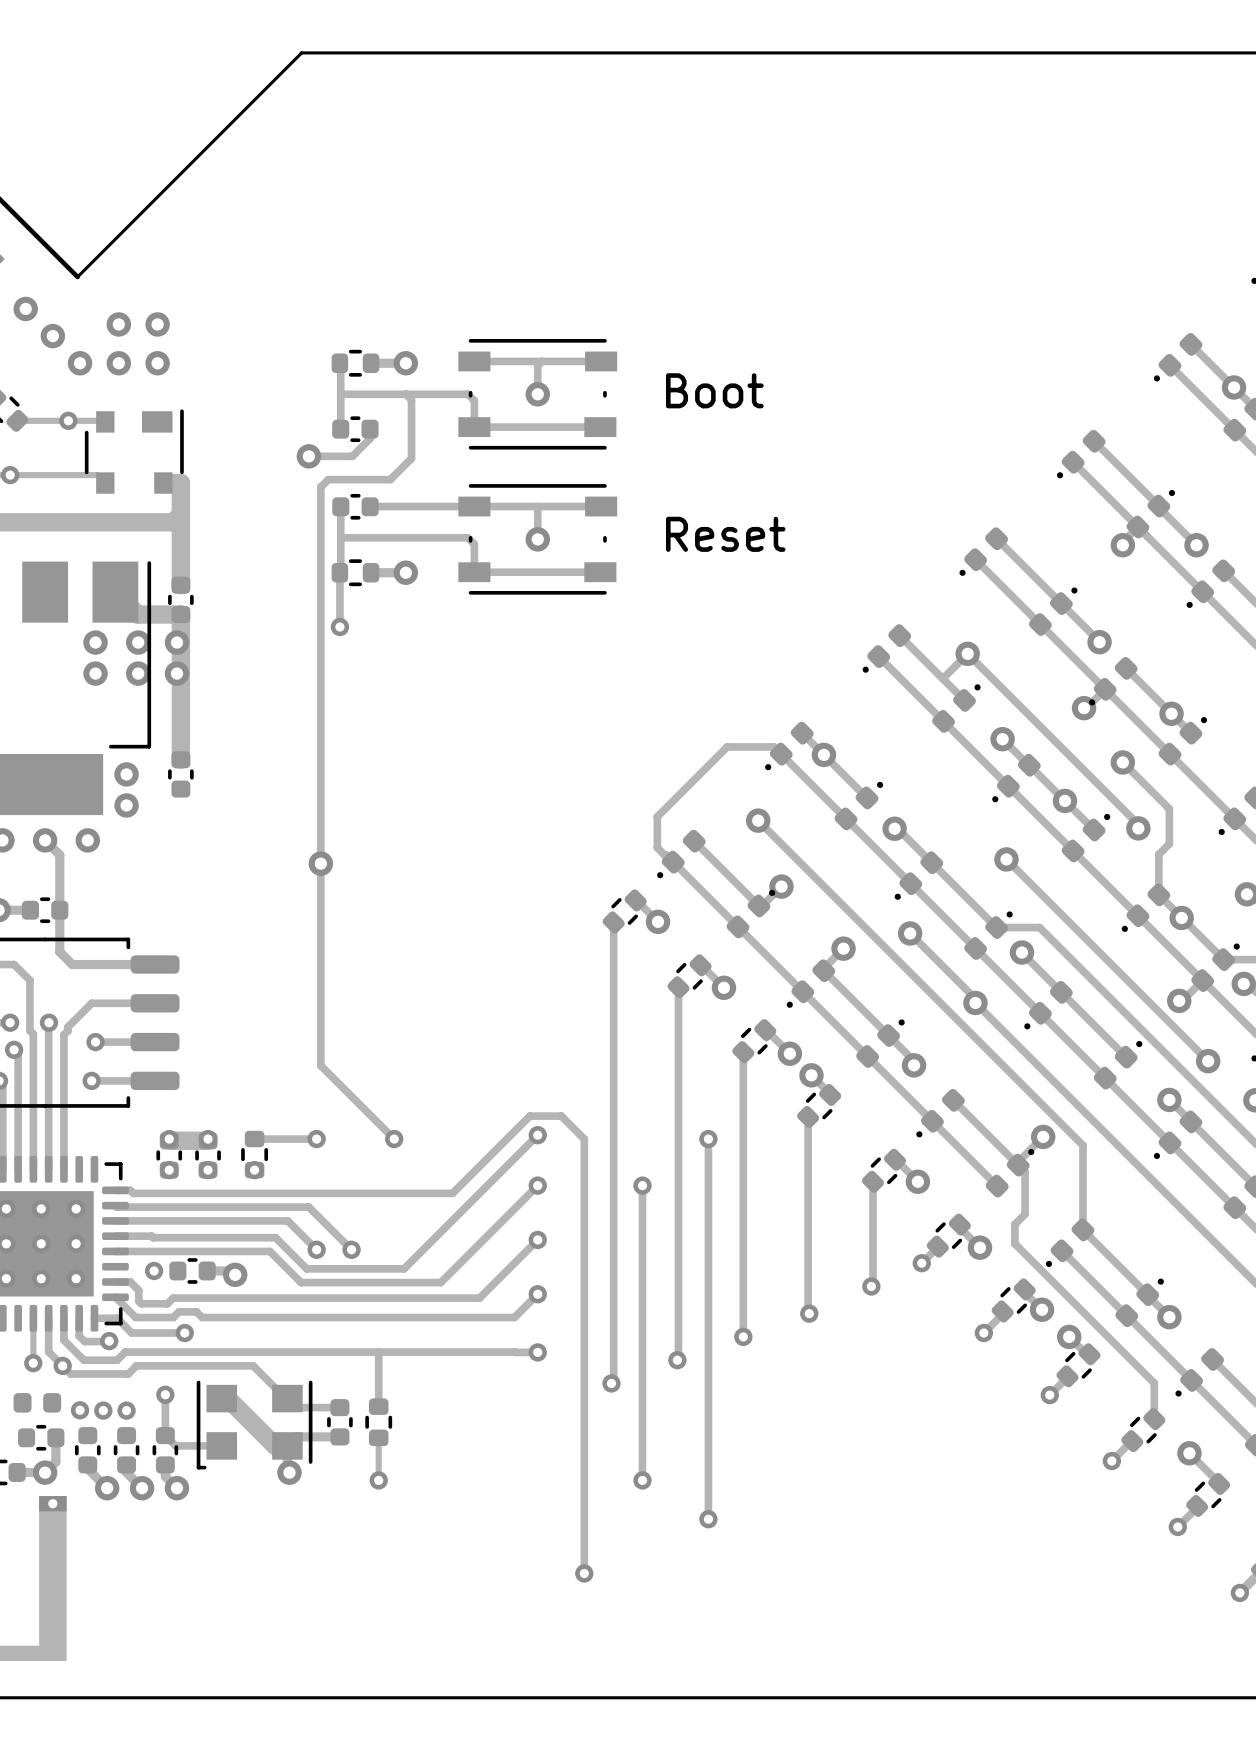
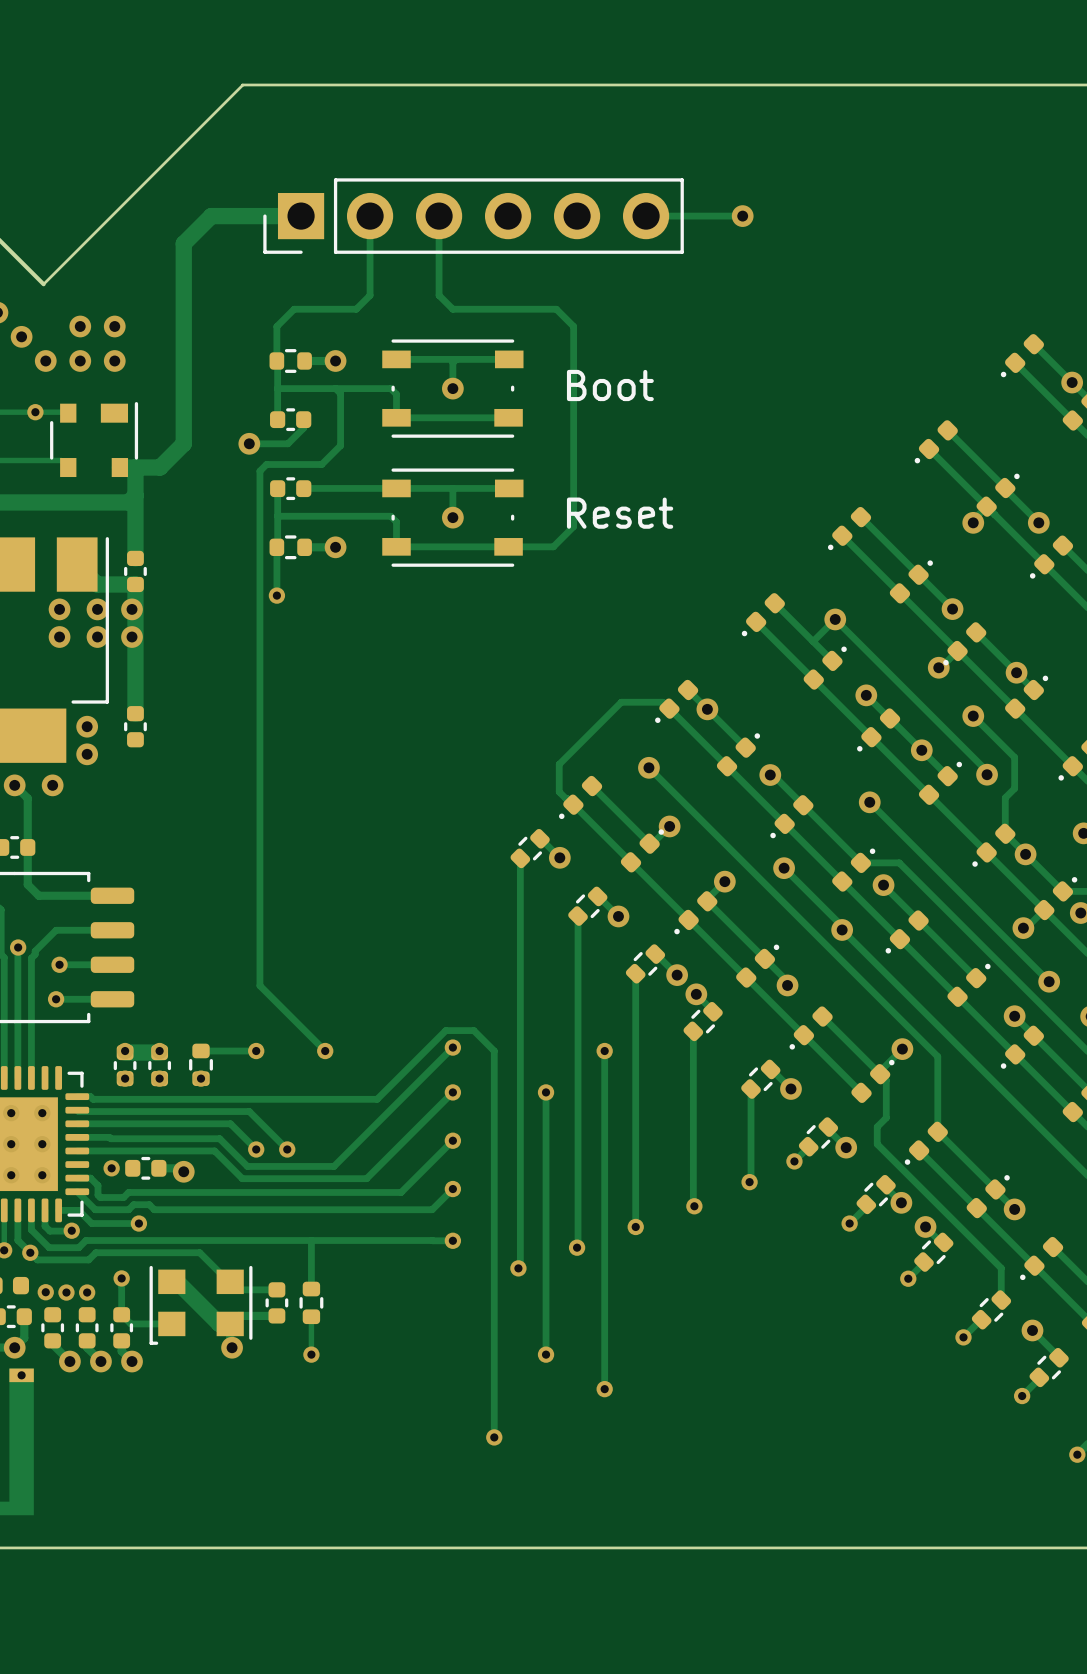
track: none -> (301, 216) (211, 216) (183, 243) (183, 443) (160, 467) (135, 467)
track: none -> (370, 216) (370, 295) (356, 309) (294, 309) (276, 326) (276, 360)
track: none -> (439, 216) (439, 295) (452, 309) (556, 309) (573, 326) (573, 526) (553, 546) (508, 546)
part: none -> (473, 216)
track: none -> (646, 216) (742, 216)
via: none -> (742, 216)
via: (320, 863) -> none

